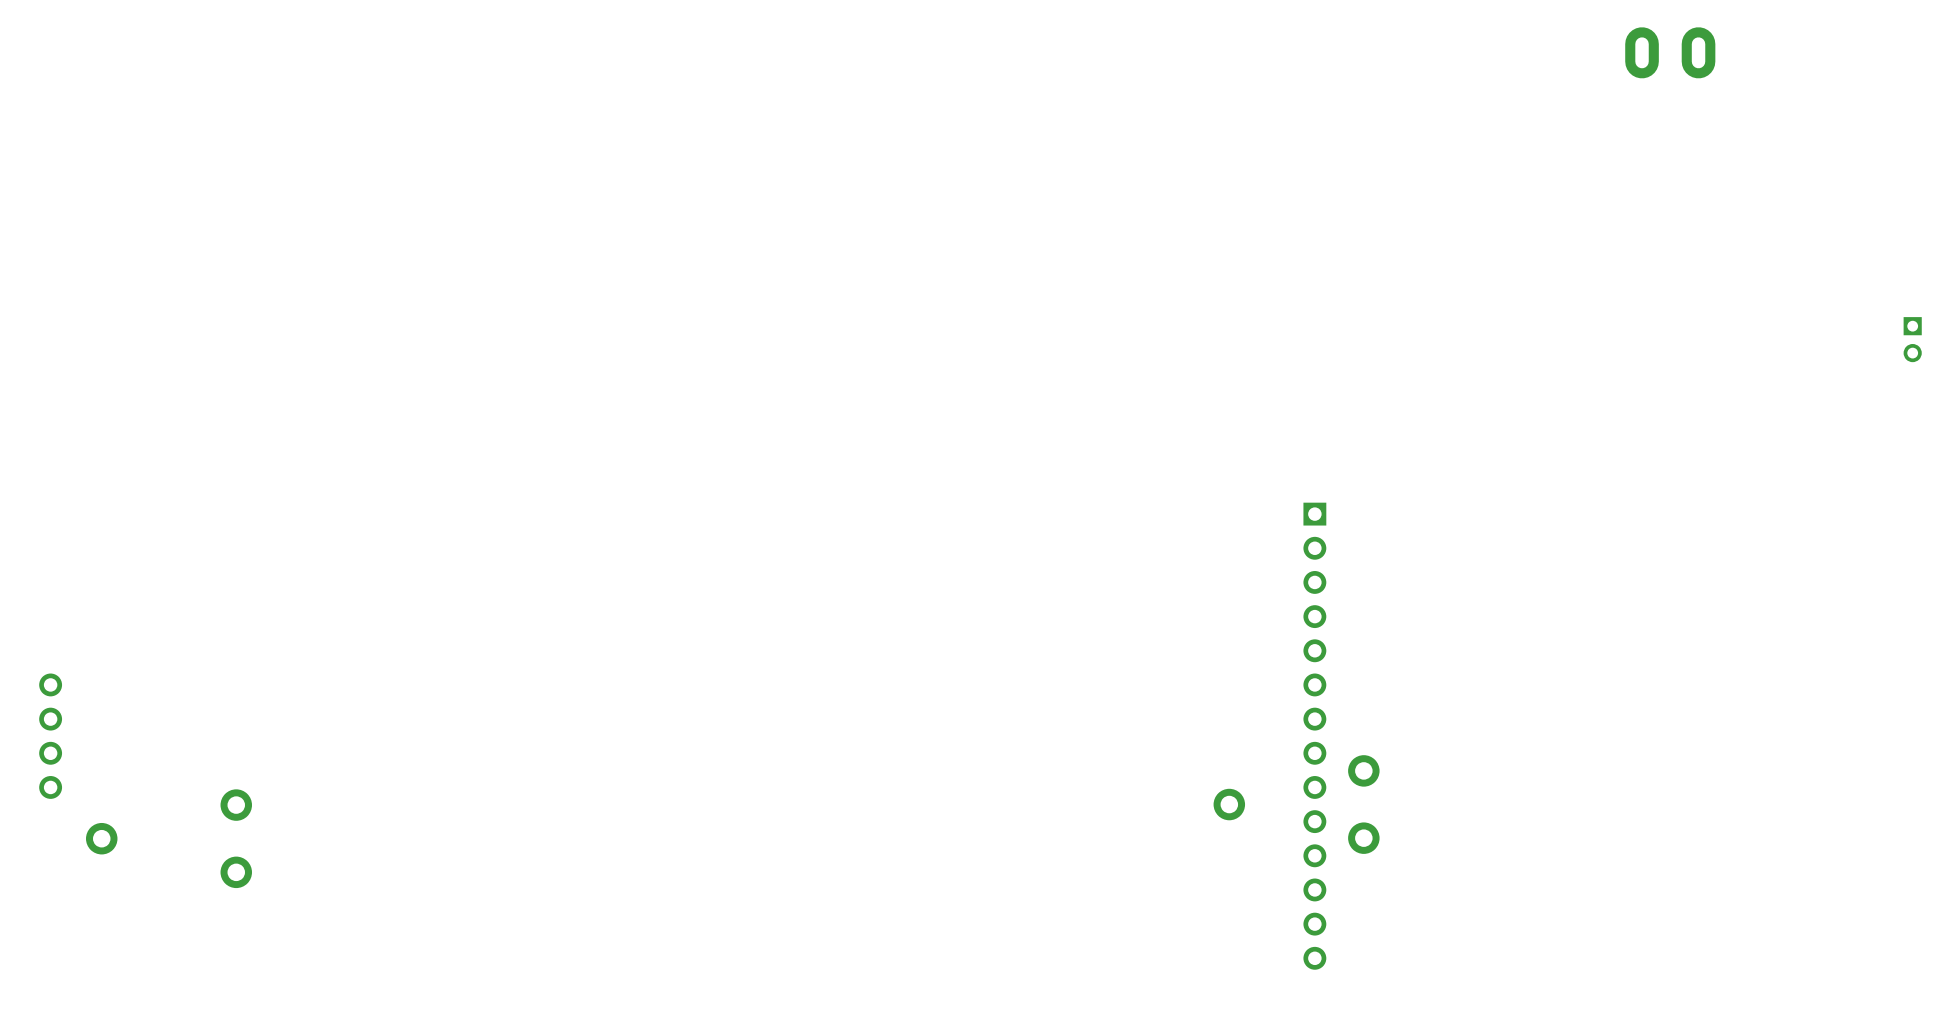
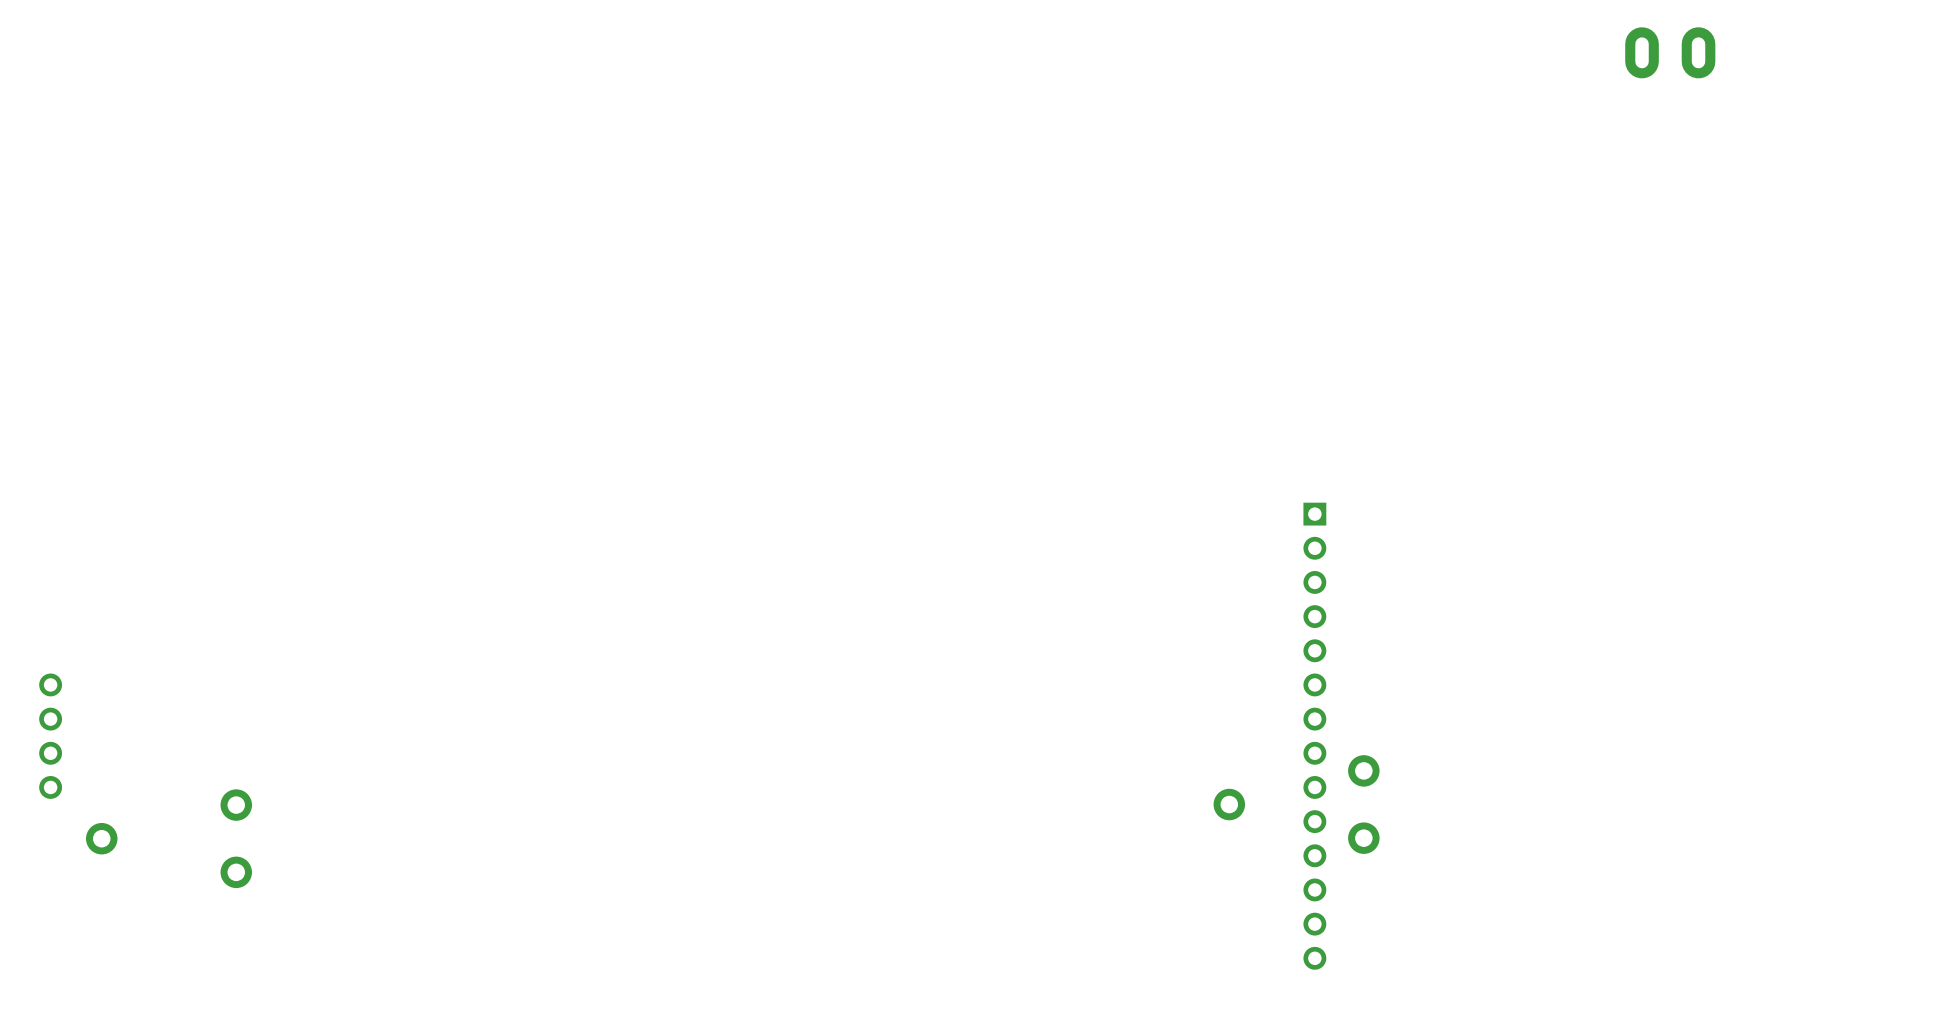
part: (1912, 339) -> none

